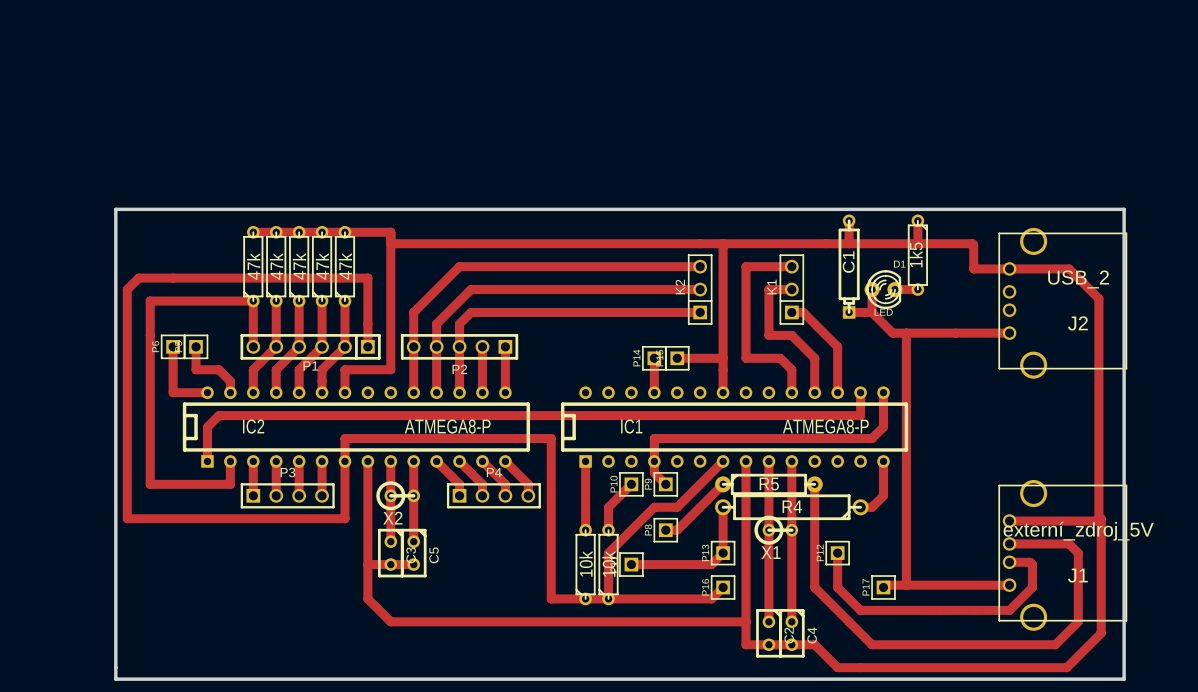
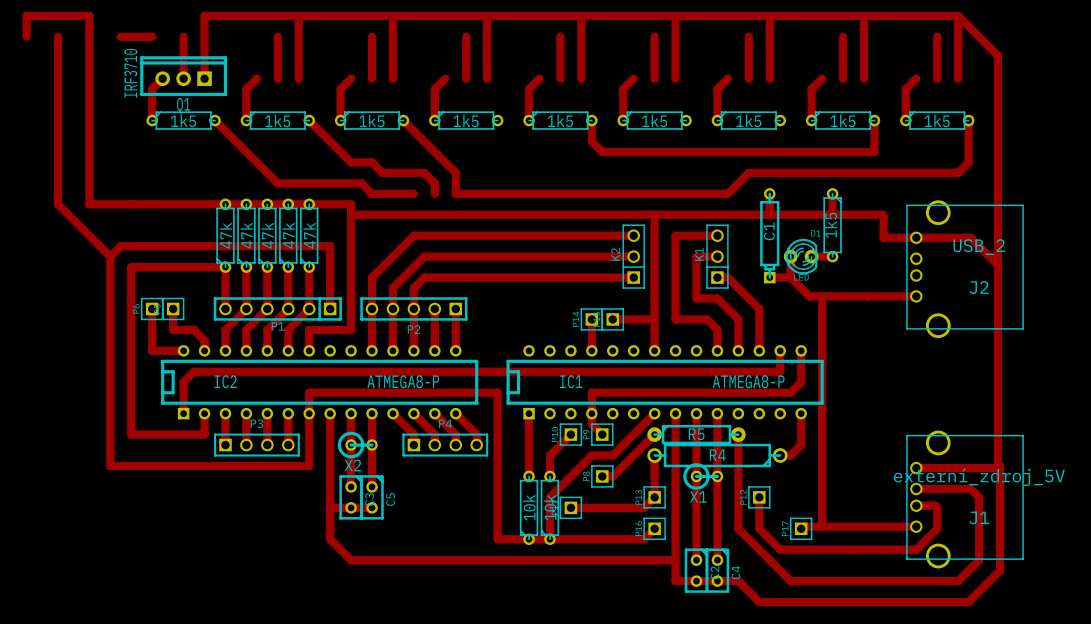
track: none -> (298, 15) (298, 78)
track: none -> (392, 15) (392, 78)
track: none -> (487, 15) (487, 78)
track: none -> (581, 15) (581, 78)
track: none -> (675, 15) (675, 78)
track: none -> (769, 15) (769, 78)
track: none -> (863, 15) (863, 78)
track: none -> (958, 15) (204, 15) (204, 78)
track: none -> (958, 15) (997, 55) (997, 265)
track: none -> (958, 15) (958, 78)
track: none -> (26, 36) (26, 15) (89, 15) (89, 204) (225, 204)
track: none -> (58, 36) (58, 204) (110, 256)
track: none -> (120, 36) (152, 36)
track: none -> (183, 36) (183, 78)
track: none -> (277, 36) (277, 78)
track: none -> (372, 36) (372, 78)
track: none -> (466, 36) (466, 78)
track: none -> (560, 36) (560, 78)
track: none -> (654, 36) (654, 78)
track: none -> (748, 36) (748, 78)
track: none -> (843, 36) (843, 78)
track: none -> (937, 36) (937, 78)
Q1: none -> IRF3710 (183, 76)
track: none -> (162, 78) (152, 89) (152, 120)
track: none -> (256, 78) (246, 89) (246, 120)
track: none -> (351, 78) (340, 89) (340, 120)
track: none -> (445, 78) (434, 89) (434, 120)
track: none -> (539, 78) (529, 89) (529, 120)
track: none -> (633, 78) (623, 89) (623, 120)
track: none -> (727, 78) (717, 89) (717, 120)
track: none -> (822, 78) (811, 89) (811, 120)
track: none -> (916, 78) (905, 89) (905, 120)
part: none -> 1k5 (183, 120)
track: none -> (215, 120) (277, 183) (361, 183) (372, 193) (413, 193)
part: none -> 1k5 (277, 120)
track: none -> (309, 120) (351, 162) (372, 162) (382, 172) (424, 172) (434, 183) (434, 193)
part: none -> 1k5 (372, 120)
track: none -> (403, 120) (455, 172) (455, 193) (727, 193) (748, 172) (958, 172) (968, 162) (968, 120)
part: none -> 1k5 (466, 120)
part: none -> 1k5 (560, 120)
track: none -> (591, 120) (591, 141) (602, 151) (874, 151) (874, 120)
part: none -> 1k5 (654, 120)
part: none -> 1k5 (748, 120)
part: none -> 1k5 (843, 120)
part: none -> 1k5 (937, 120)
board edge: (115, 209) (115, 679) (1124, 679) (1124, 209) (115, 209) -> none

